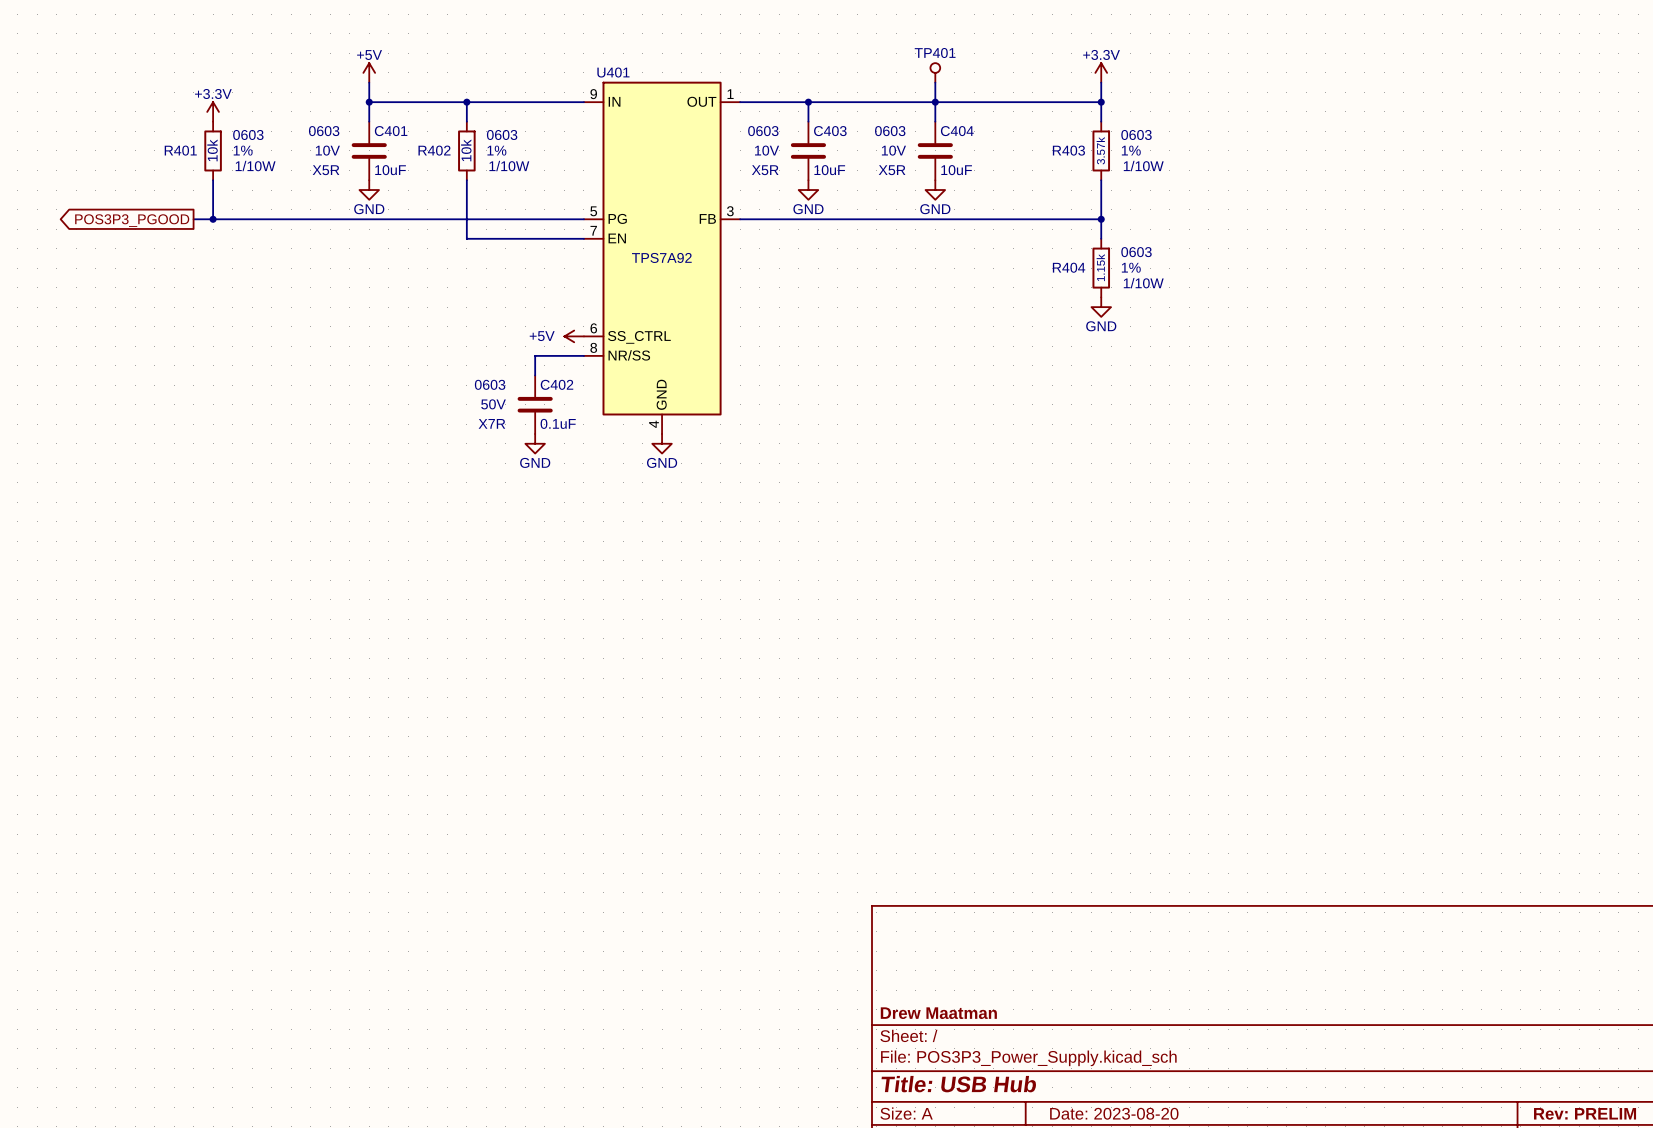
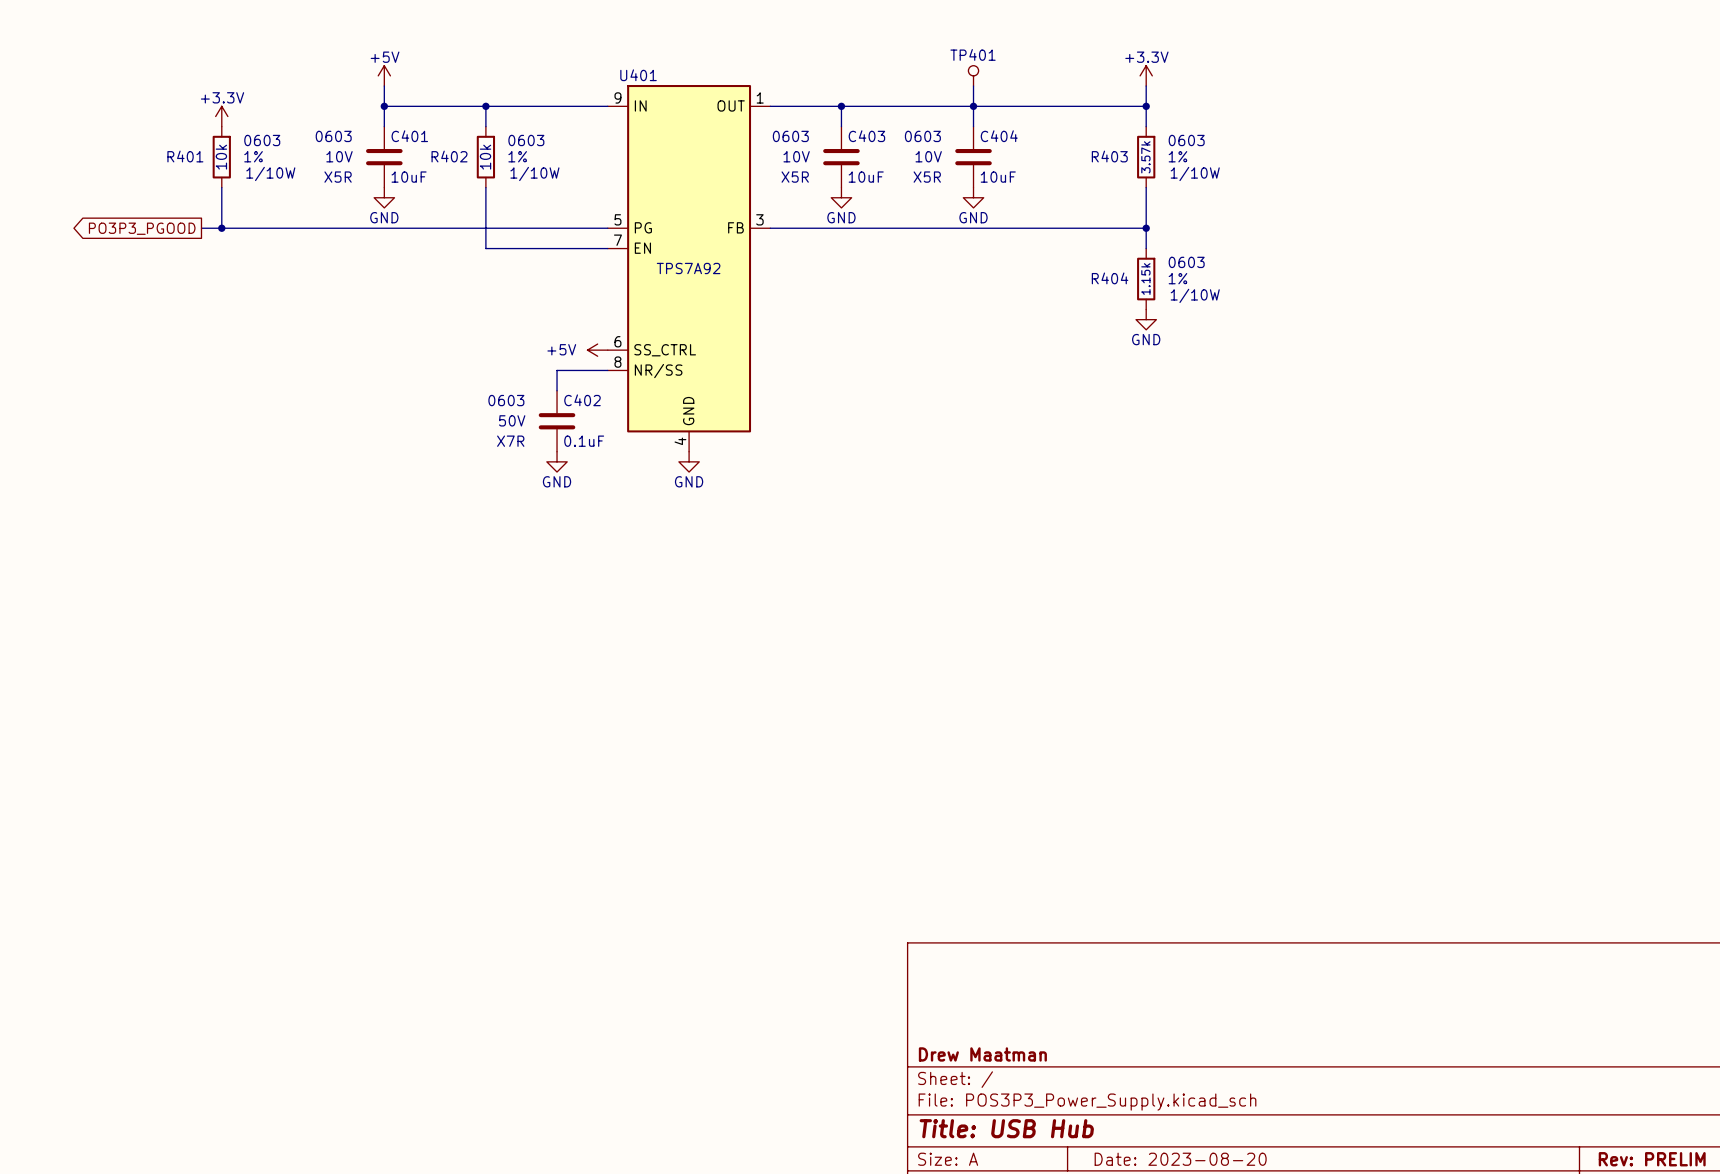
global label: POS3P3_PGOOD (132, 220) -> PO3P3_PGOOD (142, 228)

